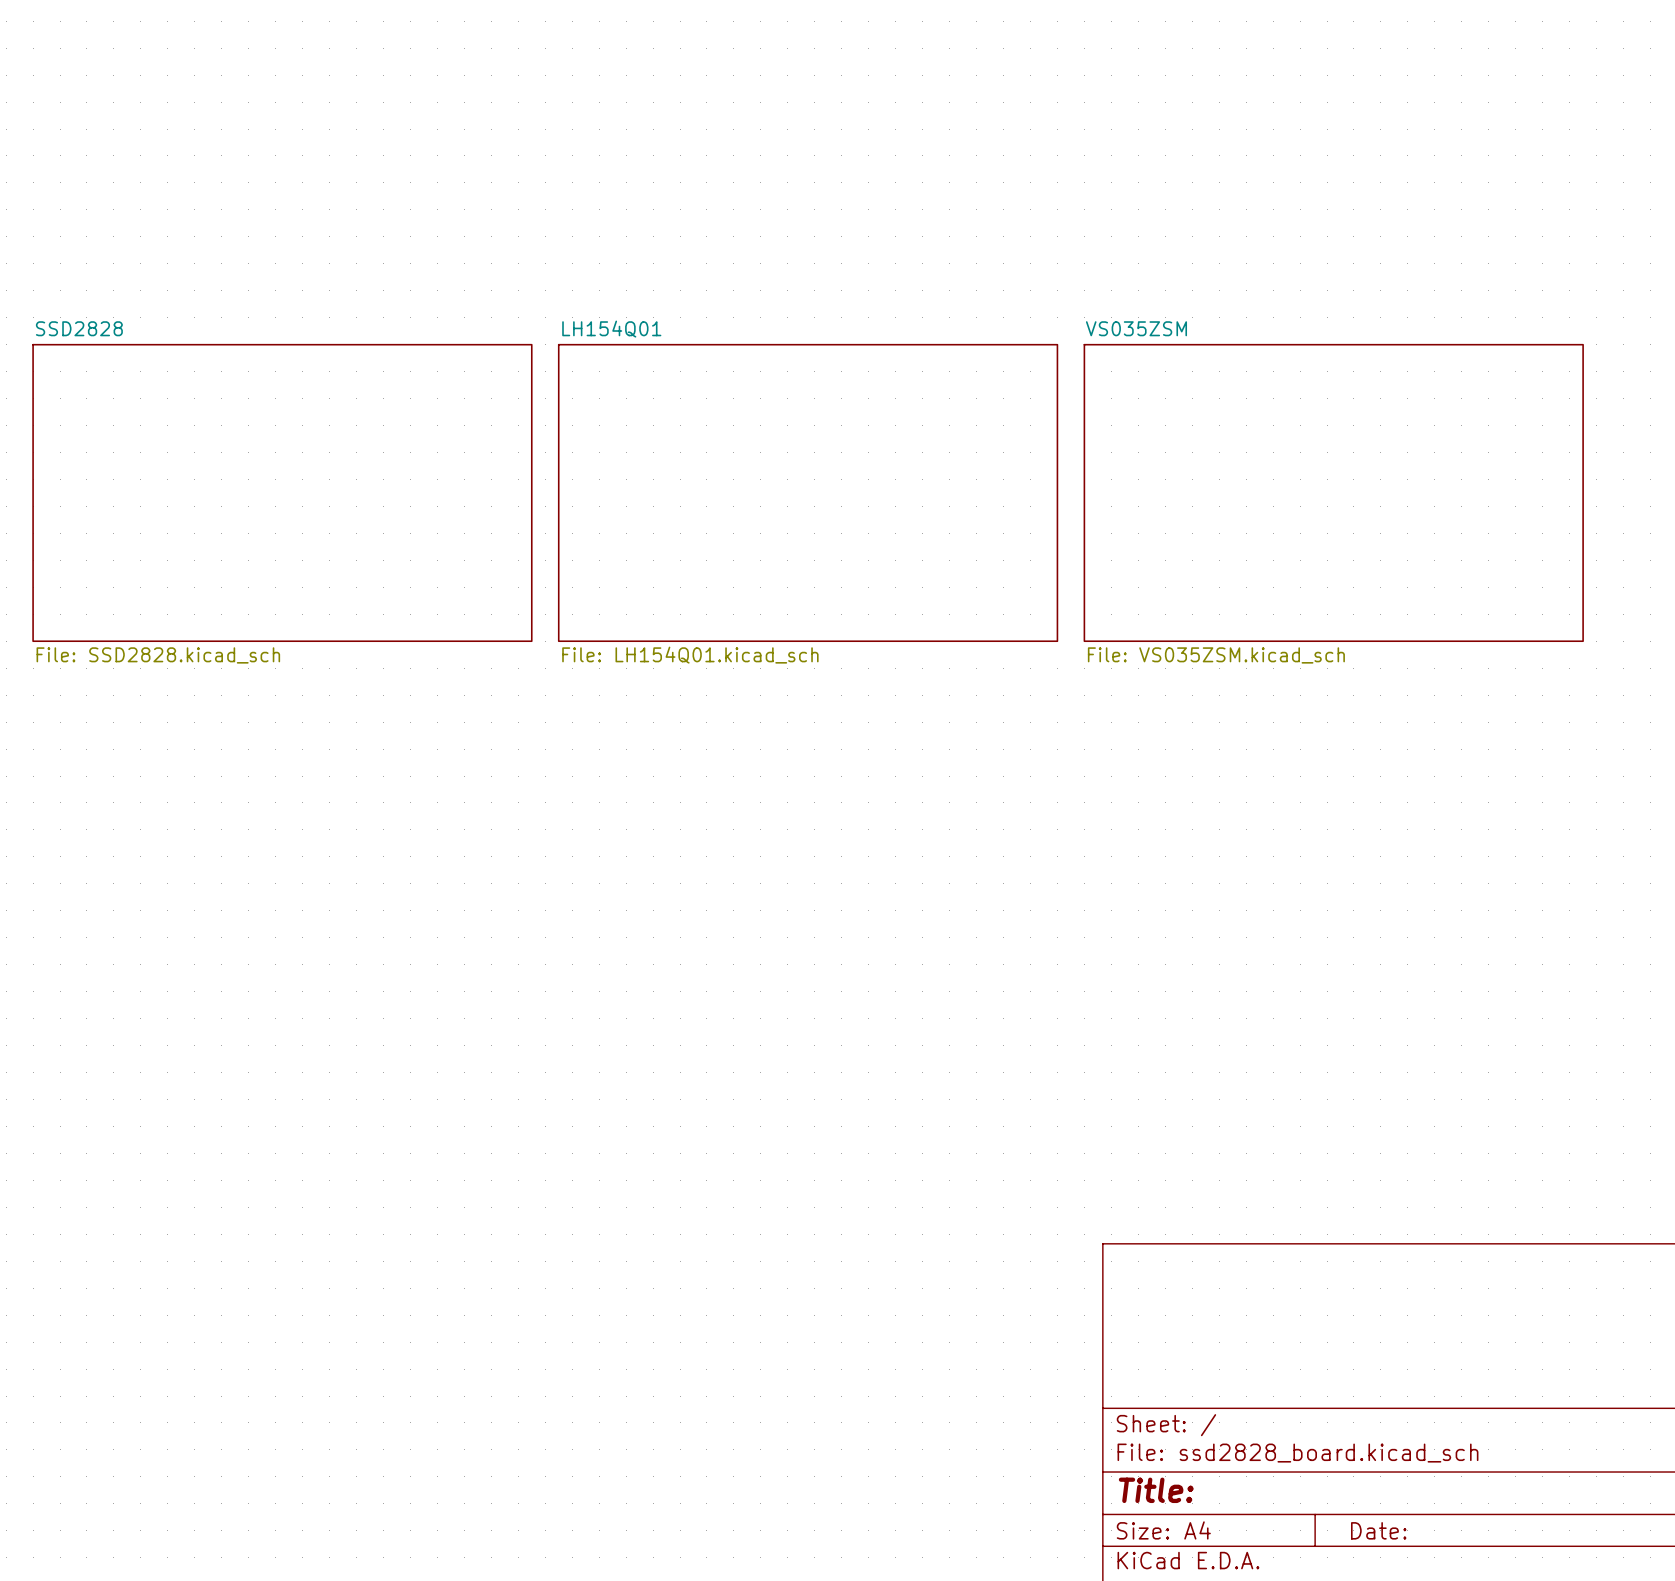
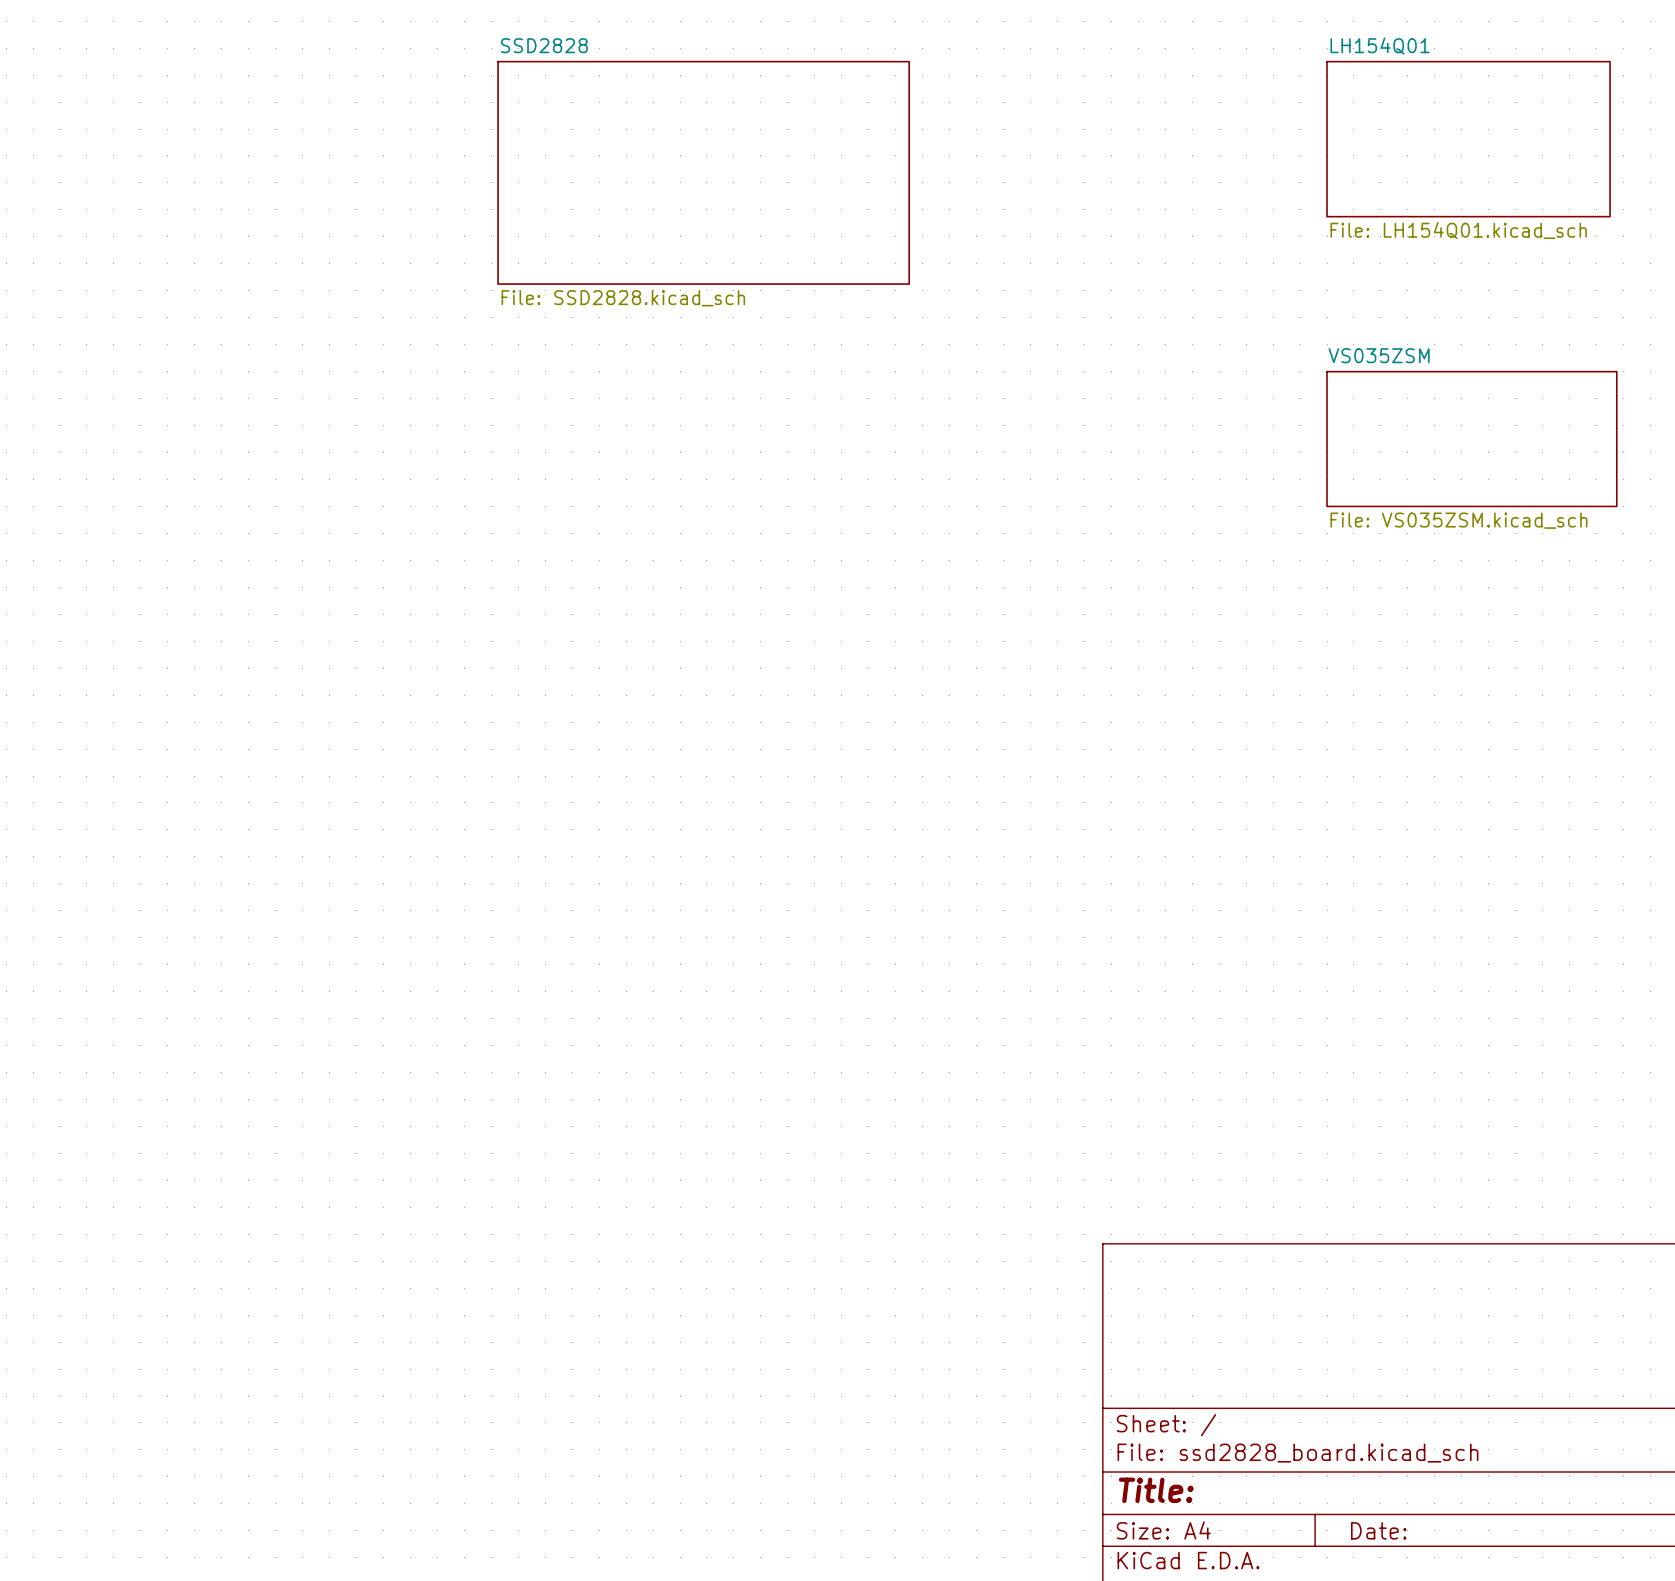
sheet SSD2828 name position: SSD2828 (79, 328) -> SSD2828 (544, 45)
sheet VS035ZSM name position: VS035ZSM (1136, 328) -> VS035ZSM (1379, 355)
sheet LH154Q01 name position: LH154Q01 (611, 329) -> LH154Q01 (1380, 46)
sheet SSD2828 shape: [32, 343, 533, 643] -> [497, 60, 910, 285]
sheet LH154Q01 shape: [557, 343, 1059, 643] -> [1326, 60, 1611, 218]
sheet VS035ZSM shape: [1083, 343, 1584, 643] -> [1326, 370, 1618, 508]
sheet SSD2828 value position: File: SSD2828.kicad_sch (158, 655) -> File: SSD2828.kicad_sch (623, 298)
sheet LH154Q01 value position: File: LH154Q01.kicad_sch (690, 655) -> File: LH154Q01.kicad_sch (1458, 230)
sheet VS035ZSM value position: File: VS035ZSM.kicad_sch (1216, 655) -> File: VS035ZSM.kicad_sch (1459, 520)

